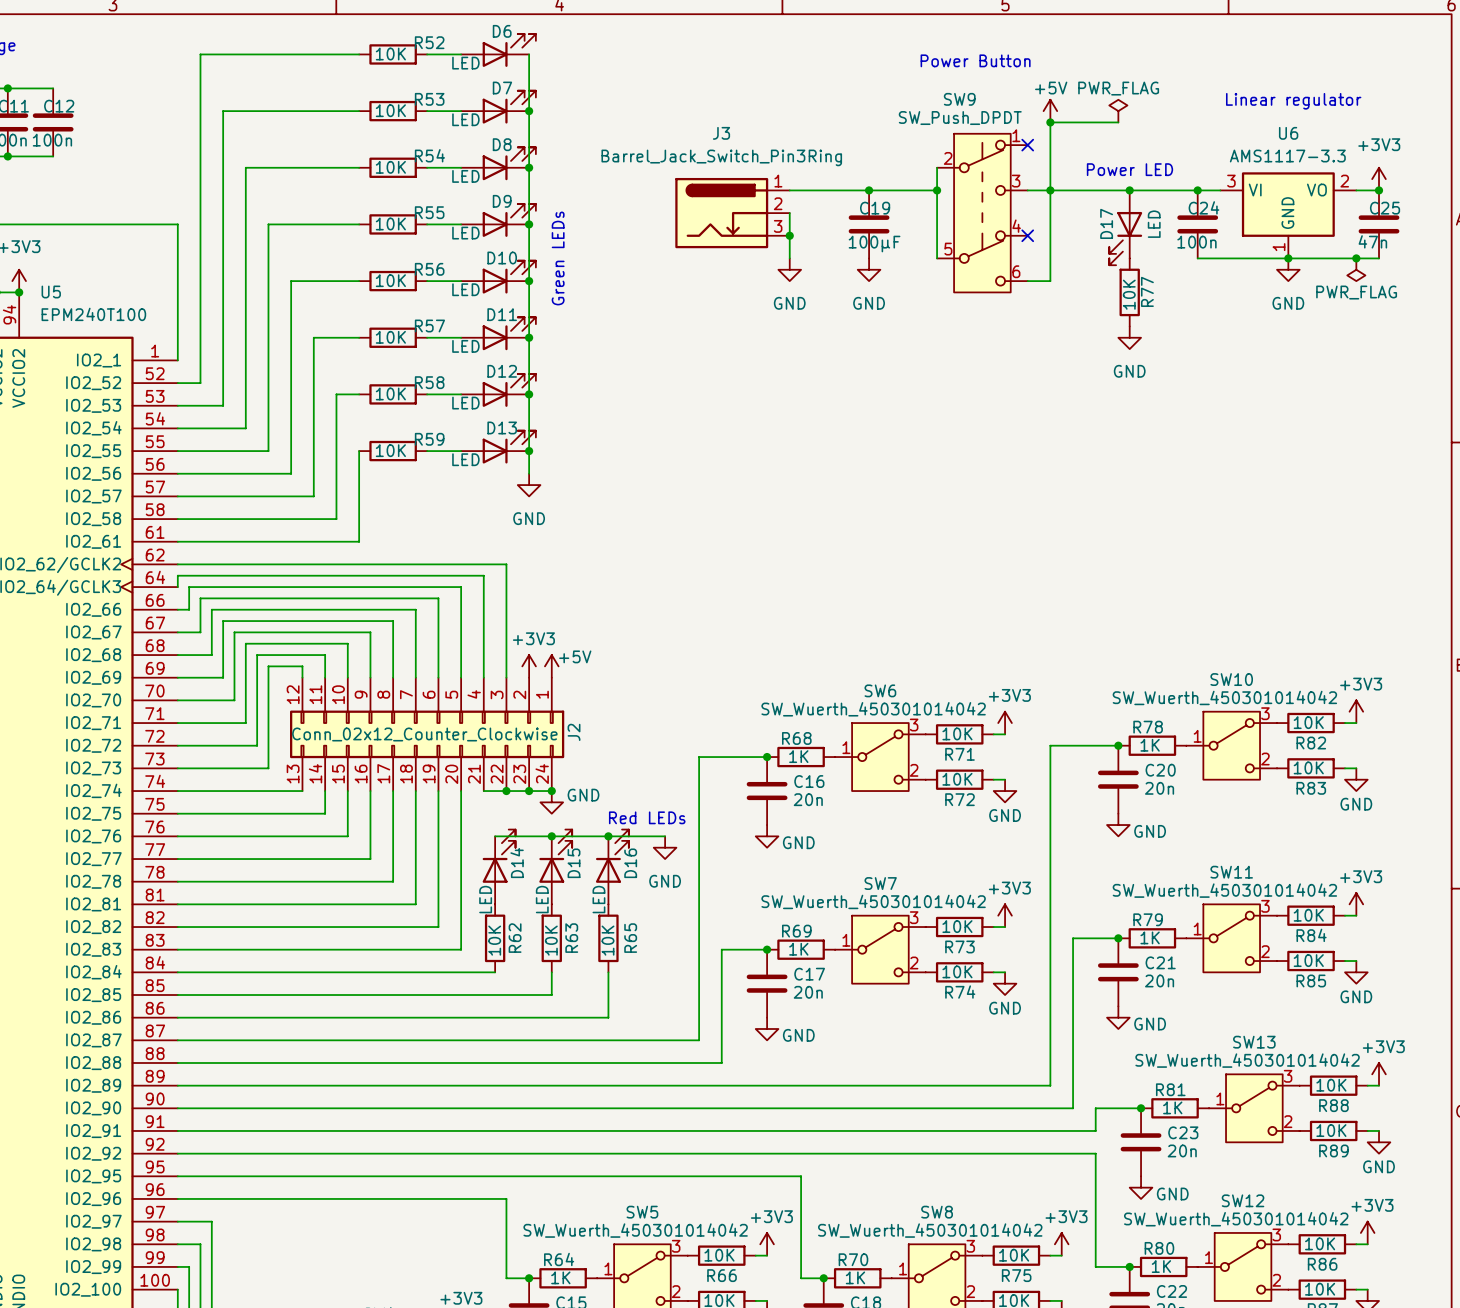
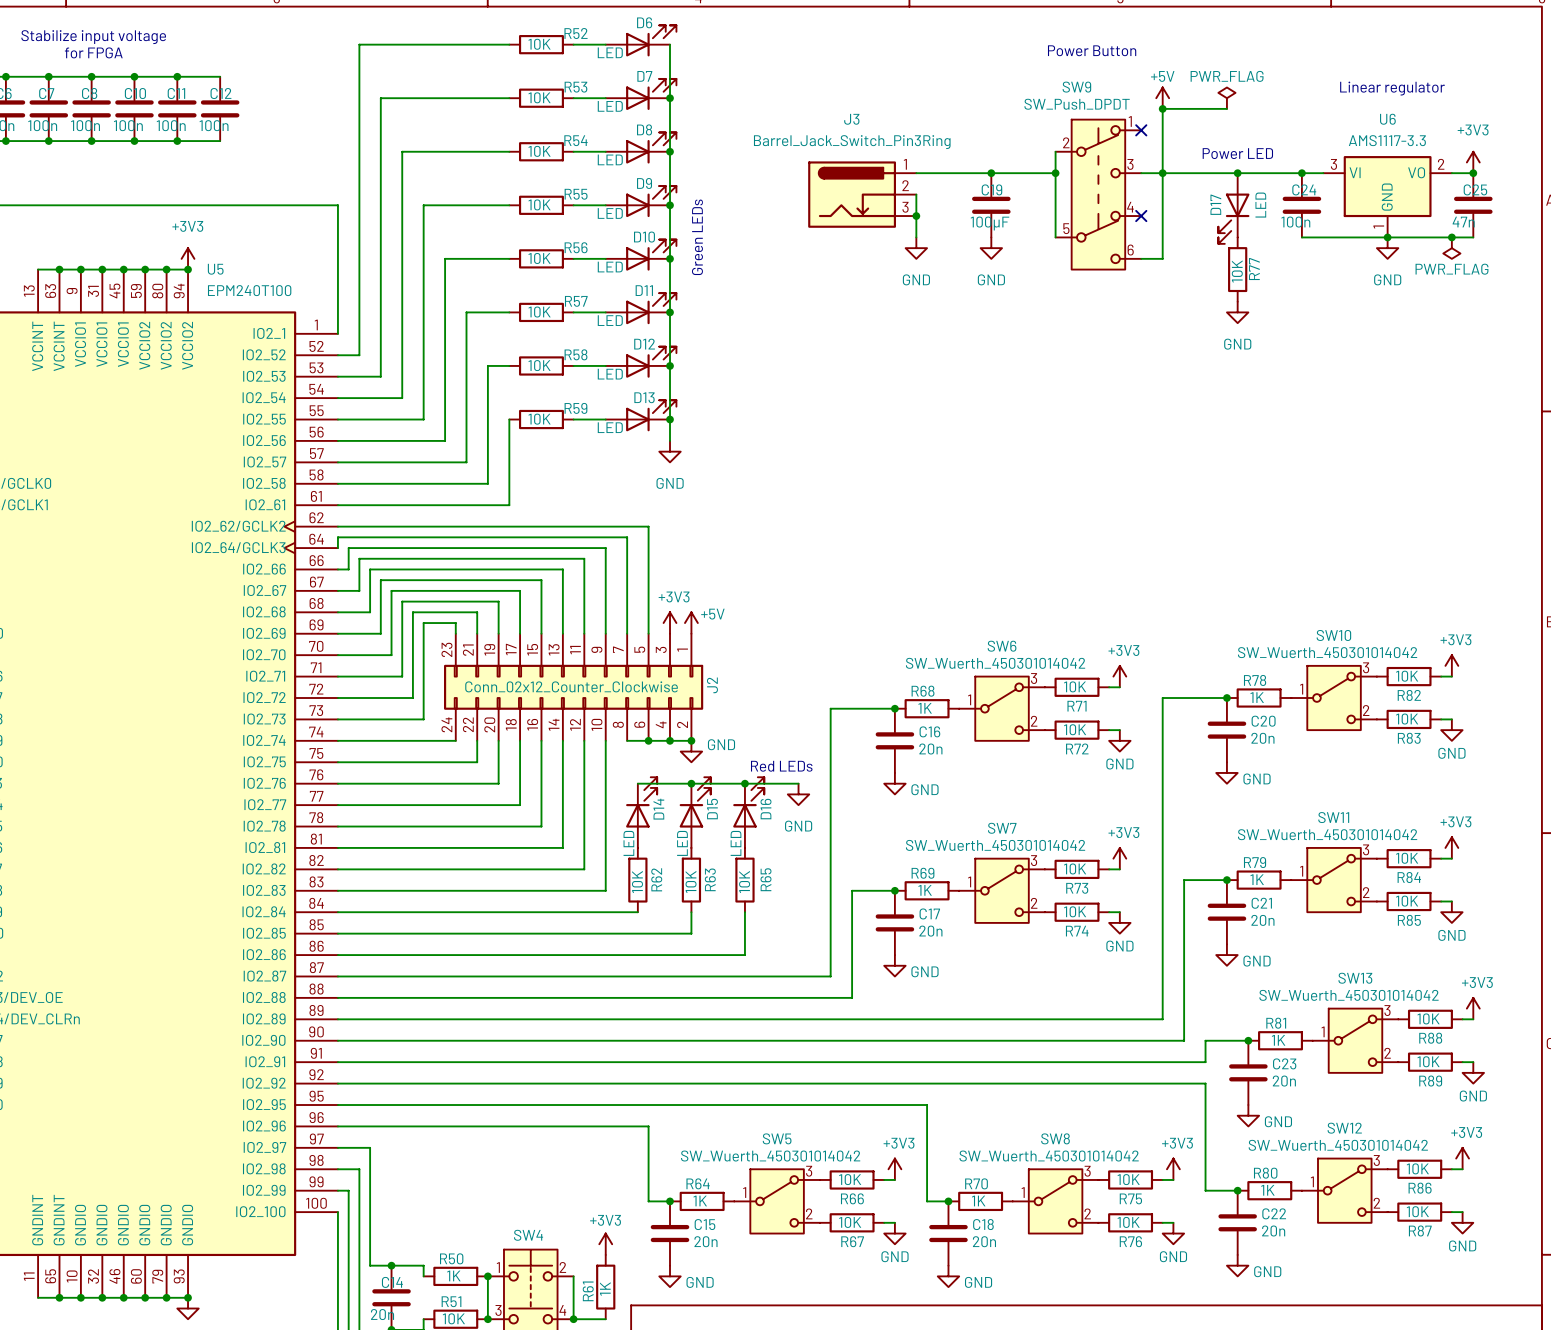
J2 symbol: [290, 677, 565, 792] -> [444, 633, 704, 741]

